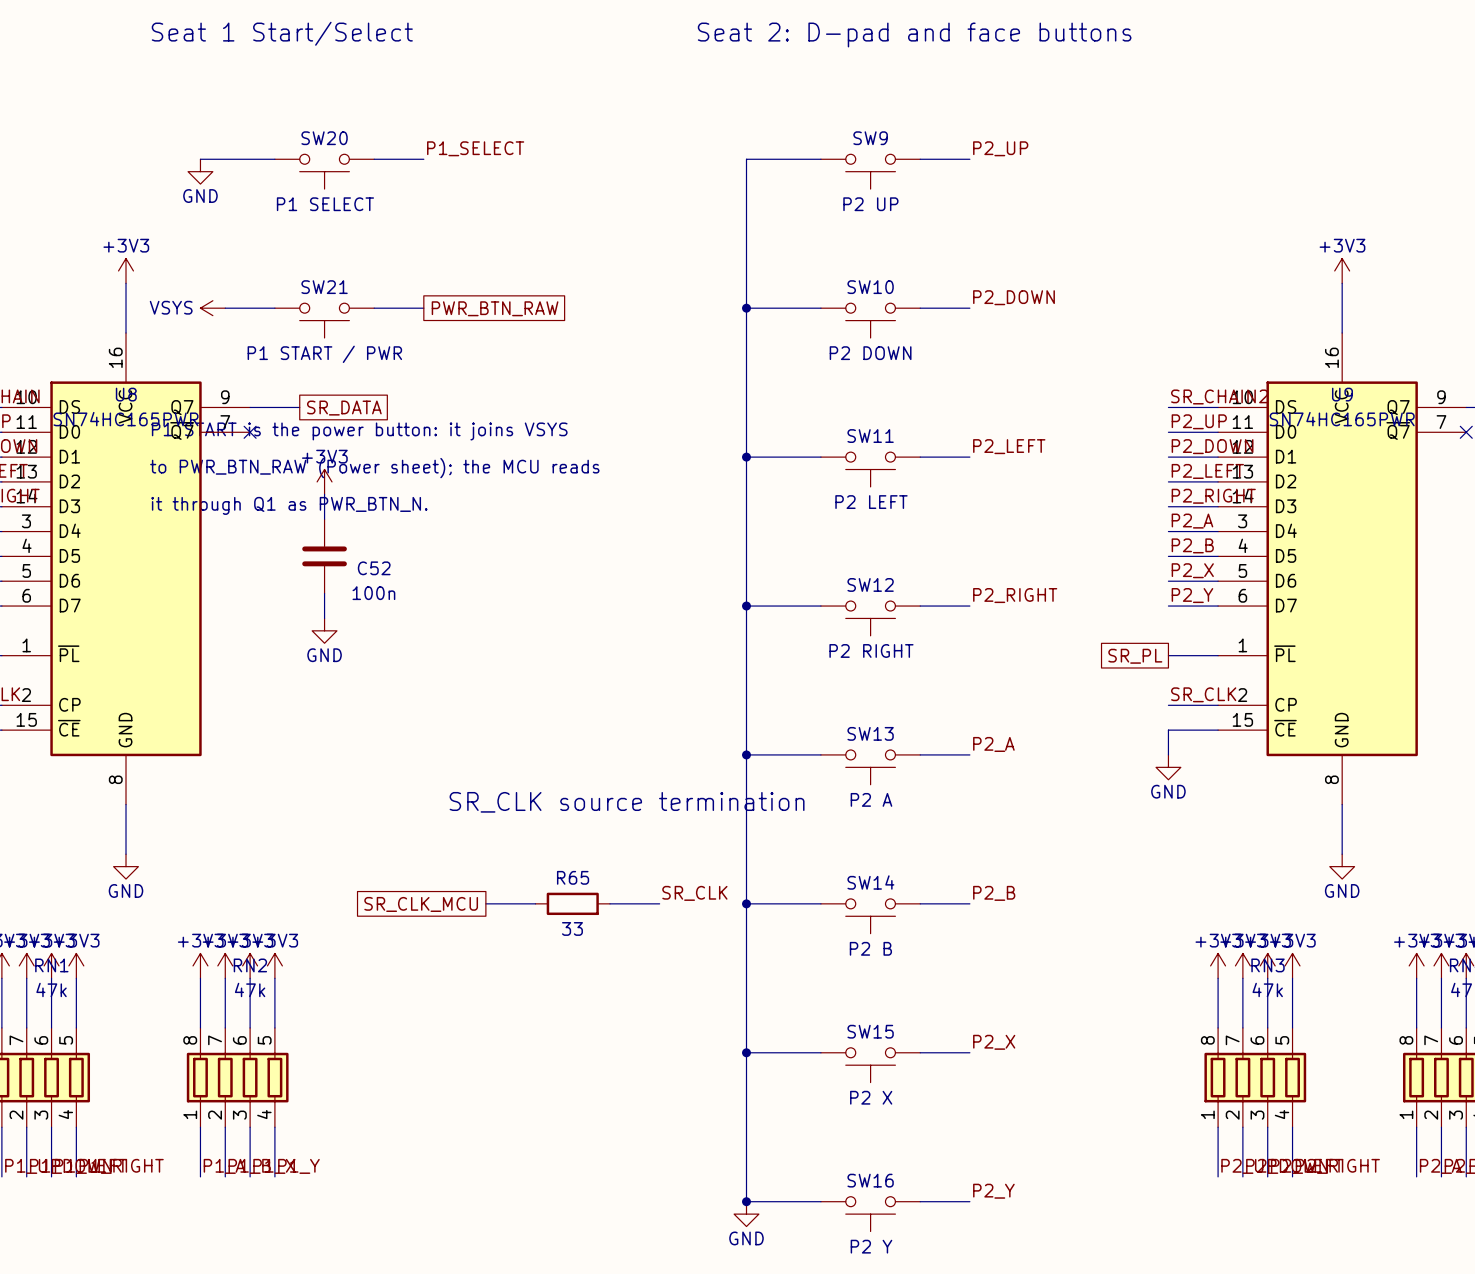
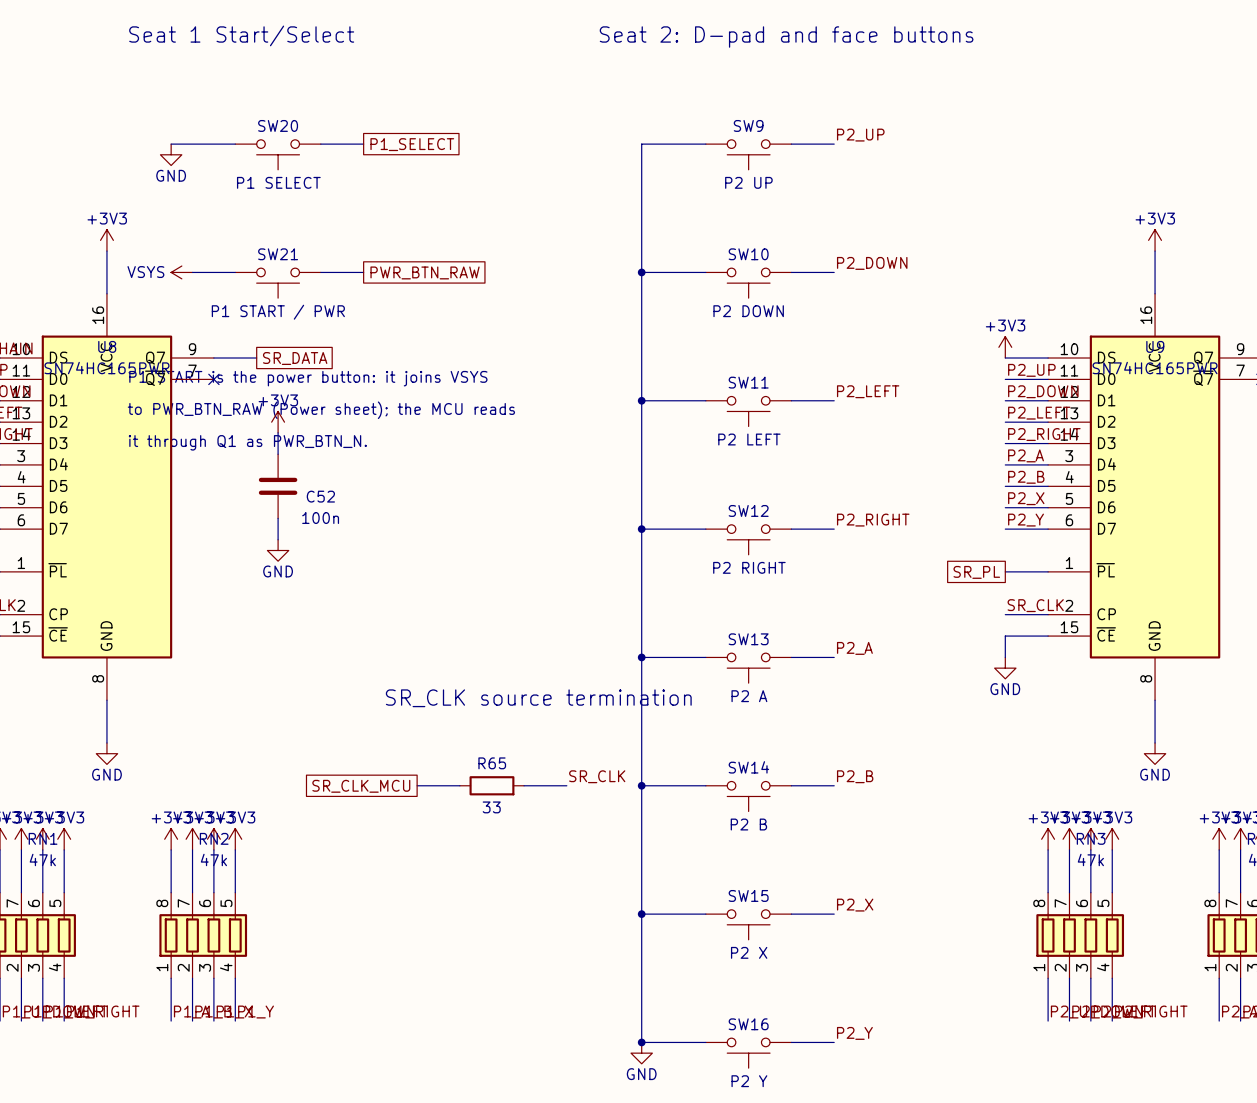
label: P1_SELECT (475, 148) -> none
global label: none -> P1_SELECT (412, 144)
power symbol: none -> +3V3 (1005, 347)
label: SR_CHAIN2 (1219, 396) -> none

